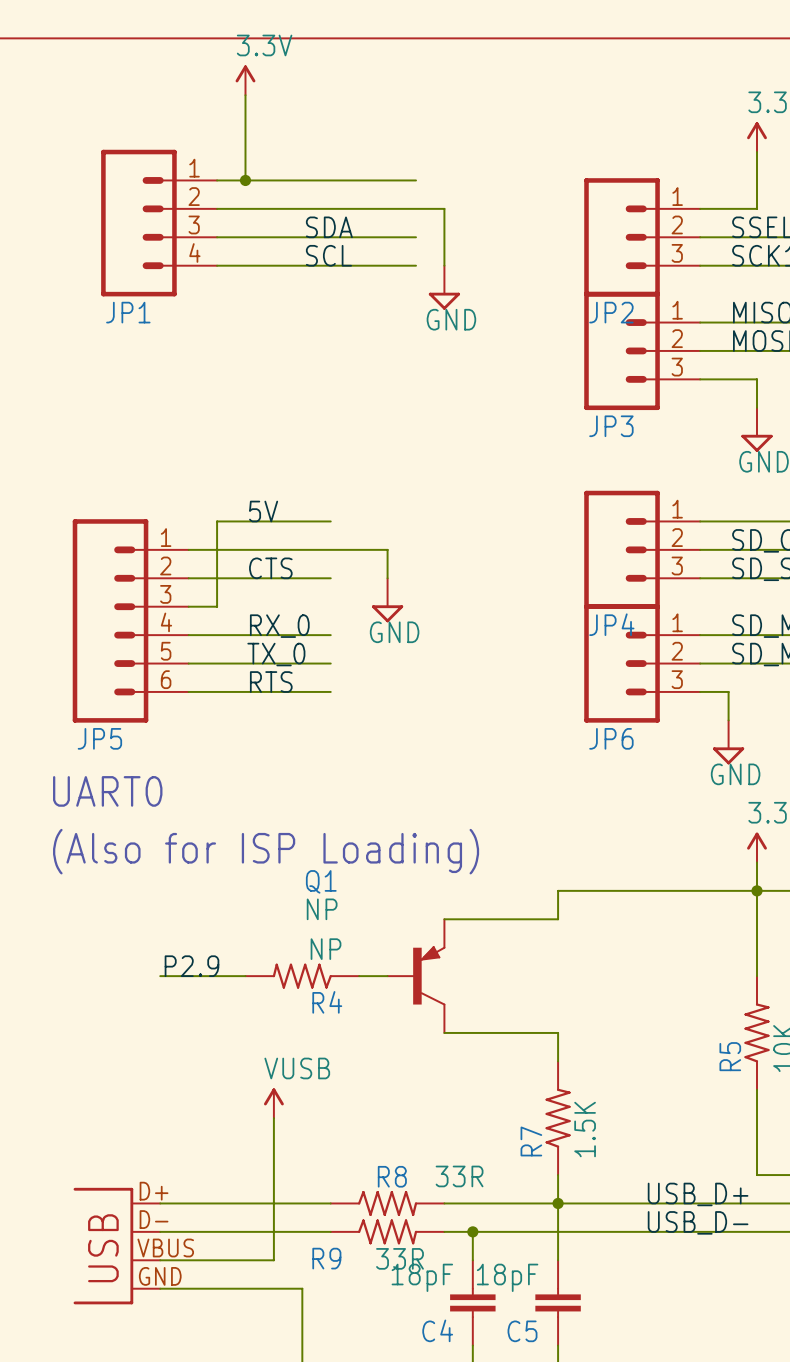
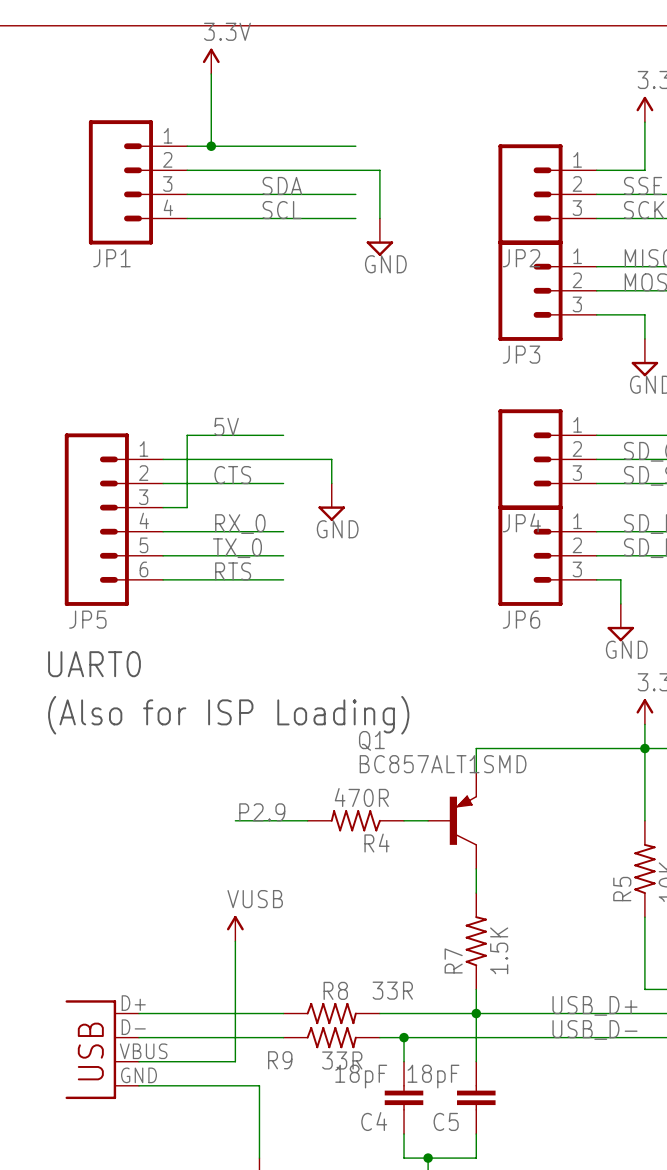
Q1 value: NP (322, 909) -> BC857ALT1SMD (443, 764)
wire: (444, 919) (558, 919) -> none
R4 value: NP (326, 949) -> 470R (361, 797)
label position: P2.9 (191, 966) -> P2.9 (262, 812)
wire: (160, 976) (245, 976) -> none
R4 position: (302, 976) -> (355, 820)
Q1 position: (416, 976) -> (452, 820)
wire: none -> (404, 820) (428, 820)
wire: (444, 1032) (558, 1032) -> none

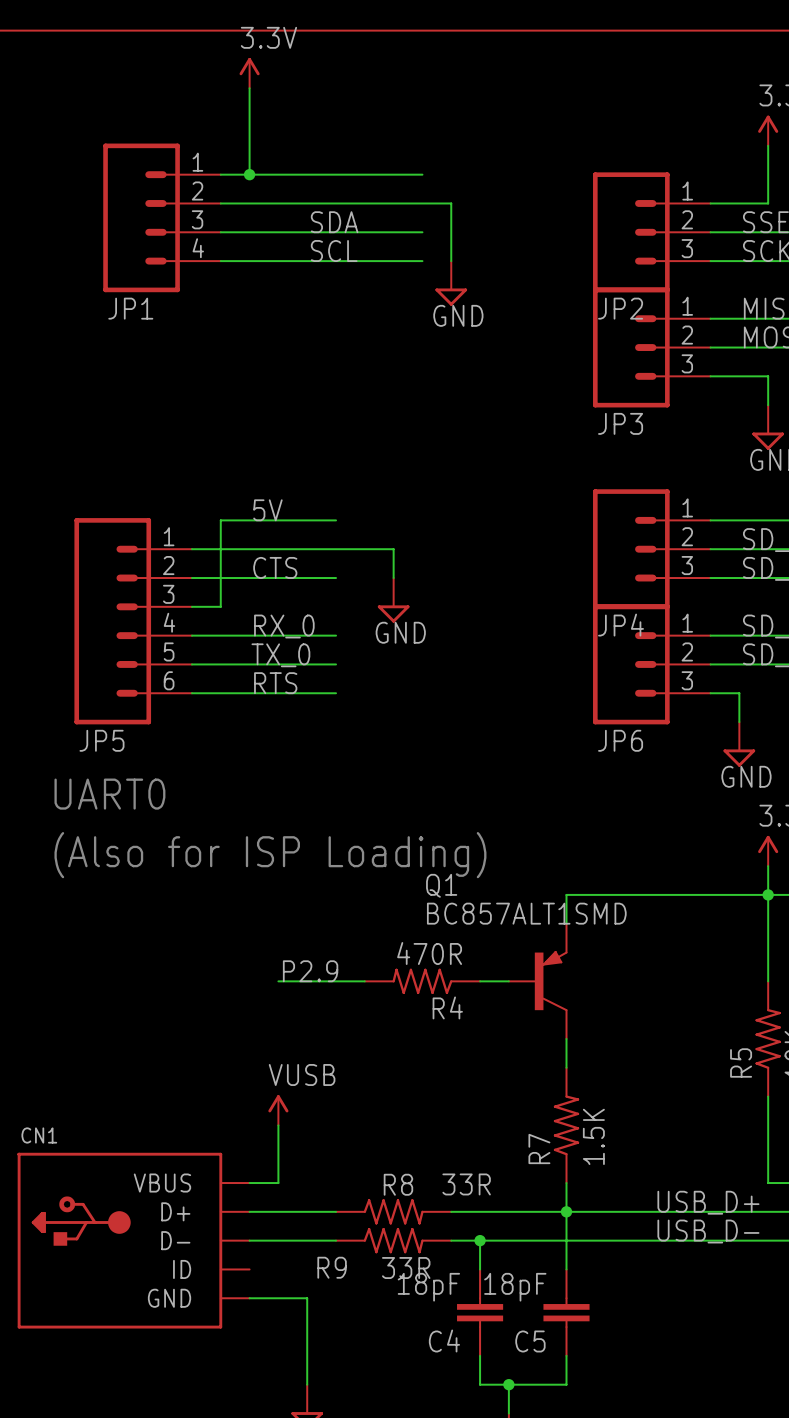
wire: (235, 989) (235, 1061) (139, 1061) -> (278, 1183) (249, 1183)
wire: (139, 1013) (211, 1013) -> none
CN1: none -> (133, 1240)
wire: (139, 1037) (211, 1037) -> none
part: (102, 1049) -> none
wire: (139, 1085) (211, 1085) -> none

